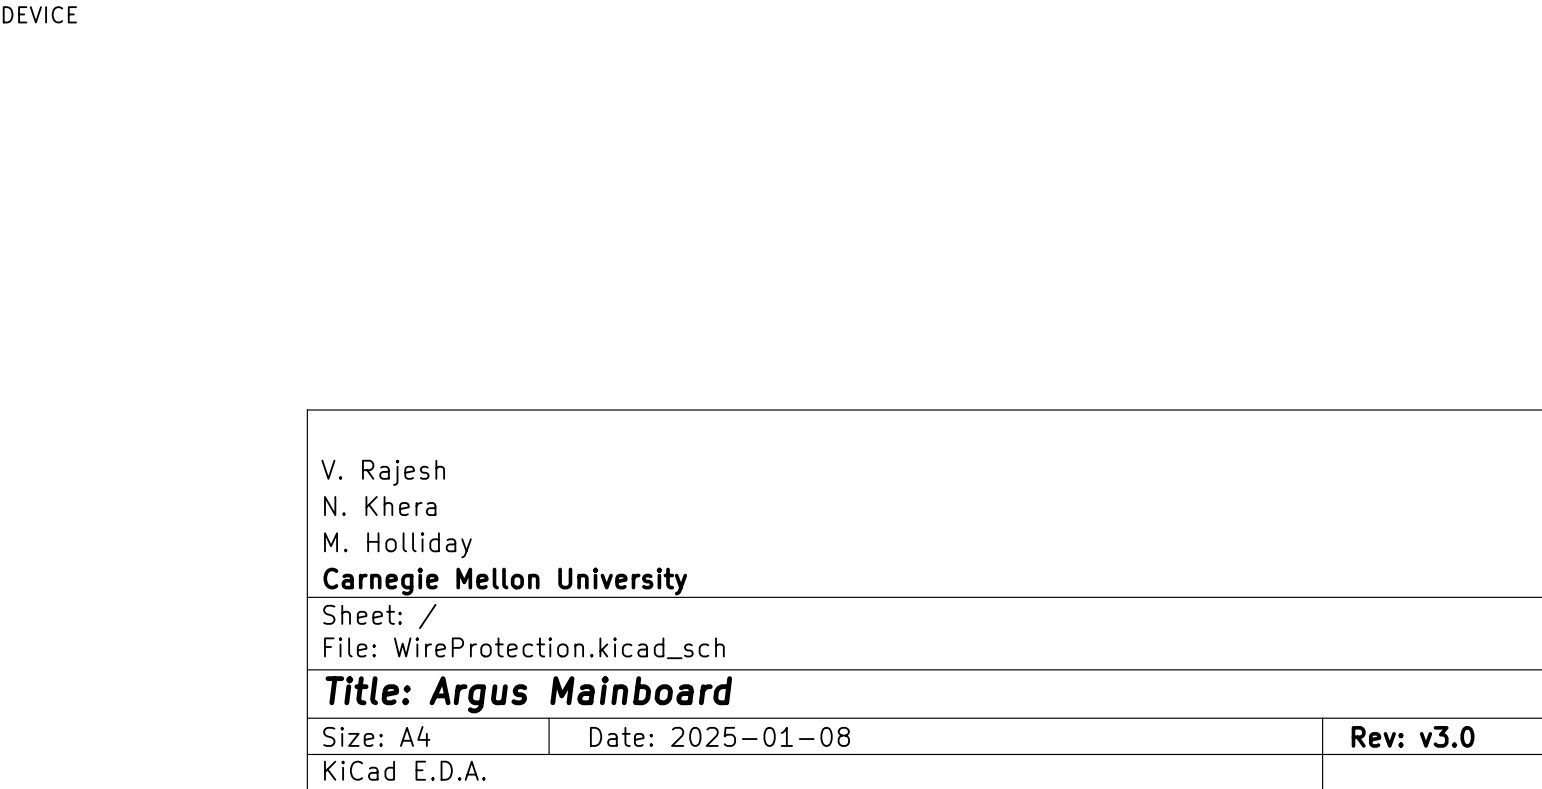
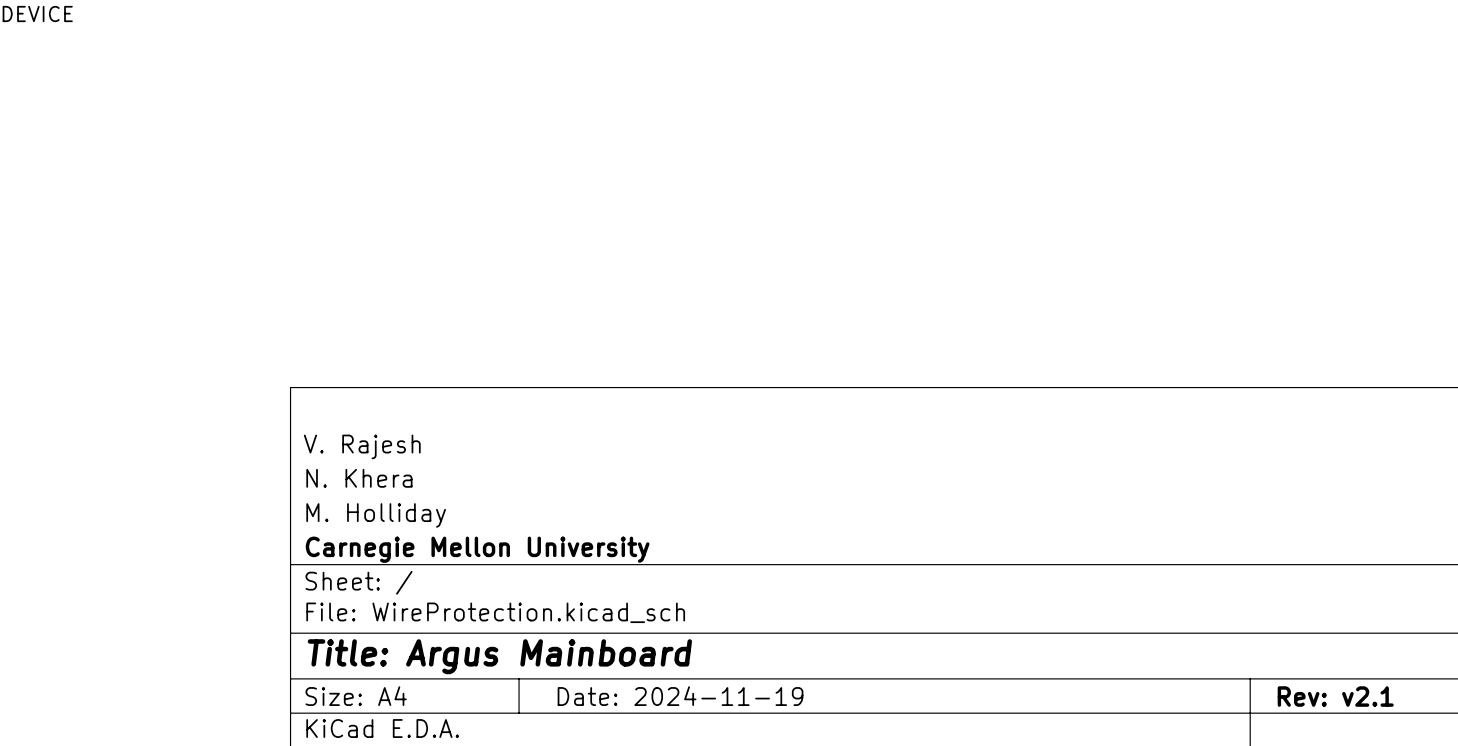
title block: Date: 2025-01-08 (719, 736) -> Date: 2024-11-19 (680, 696)
title block: Rev: v3.0 (1413, 736) -> Rev: v2.1 (1335, 696)

